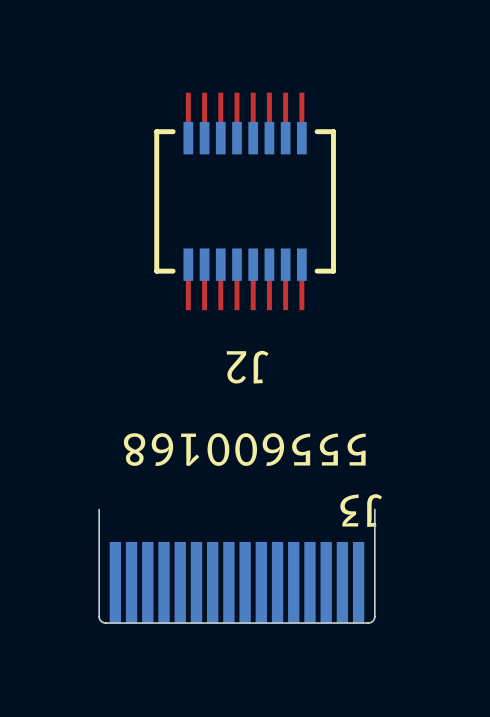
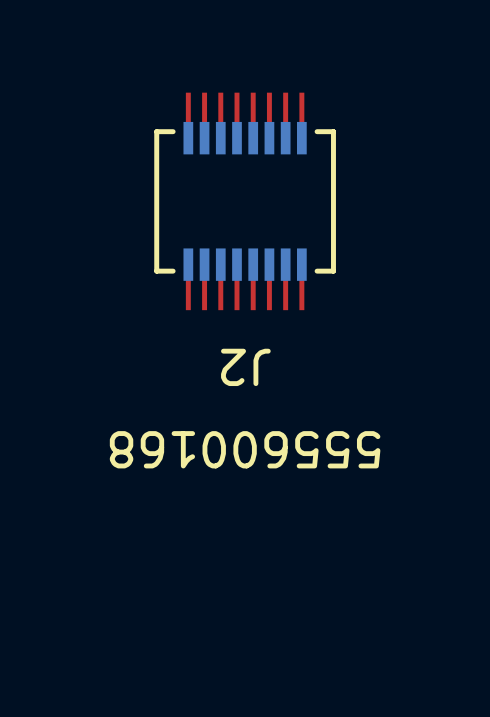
J3: (236, 566) -> none

